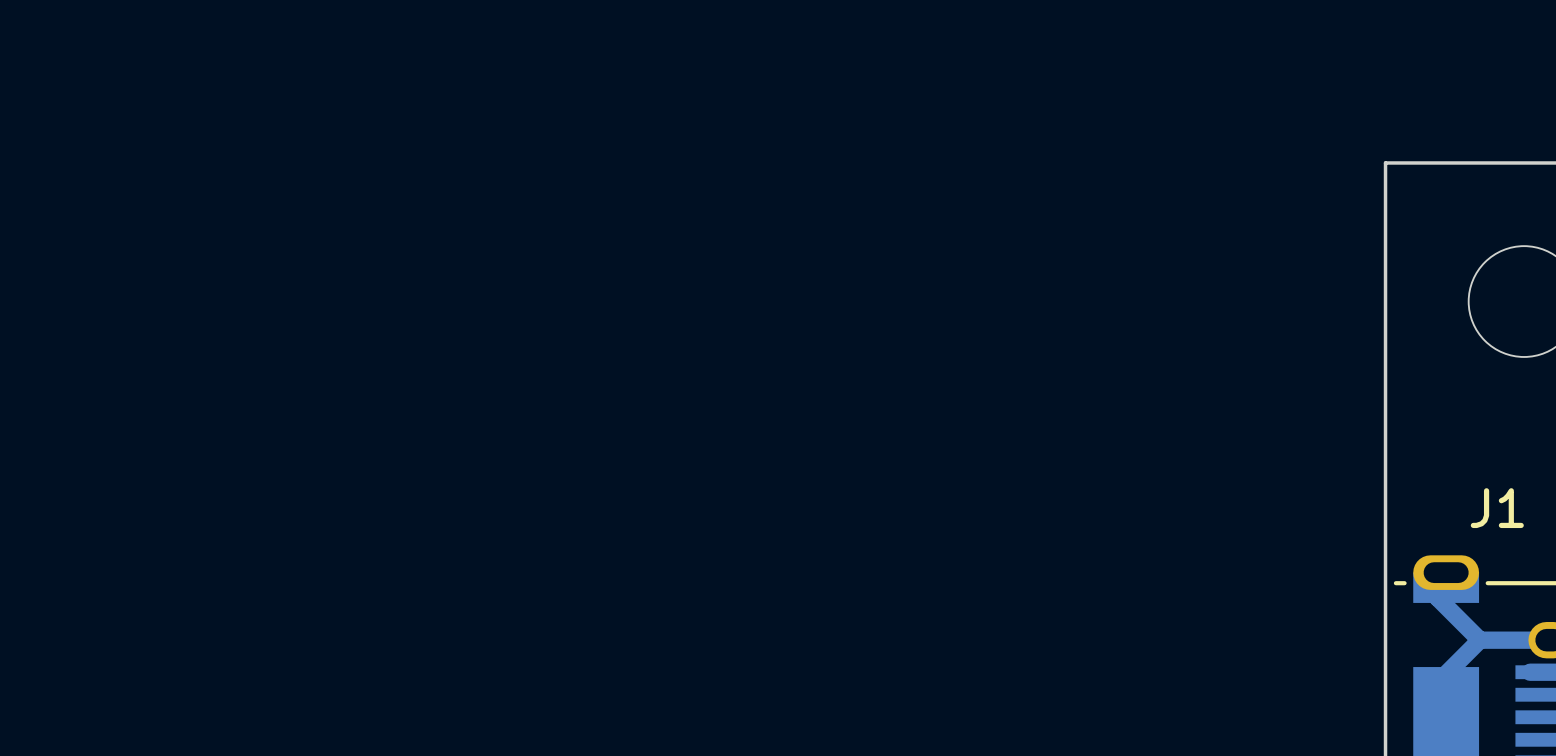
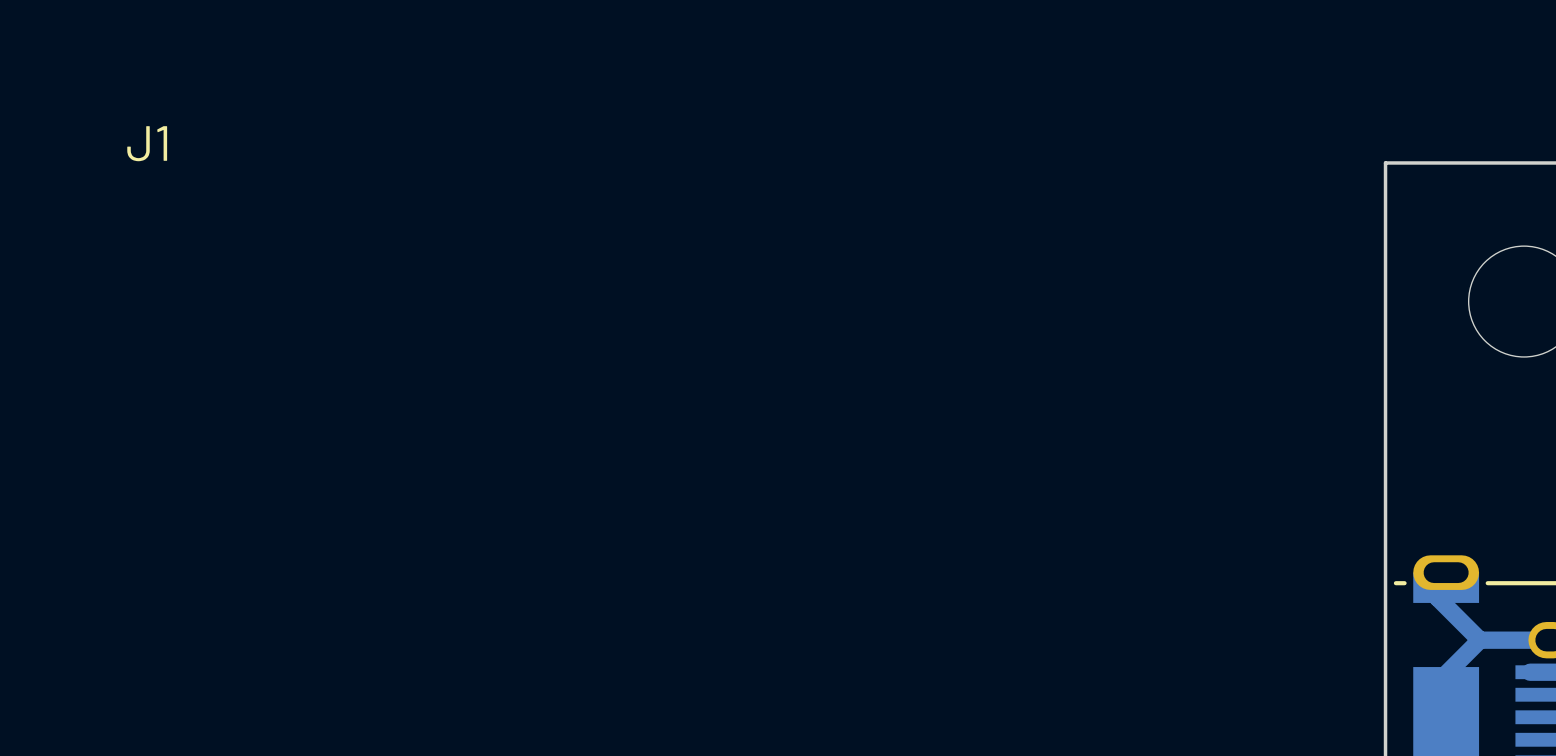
J1 name position: J1 (1497, 508) -> J1 (147, 143)

